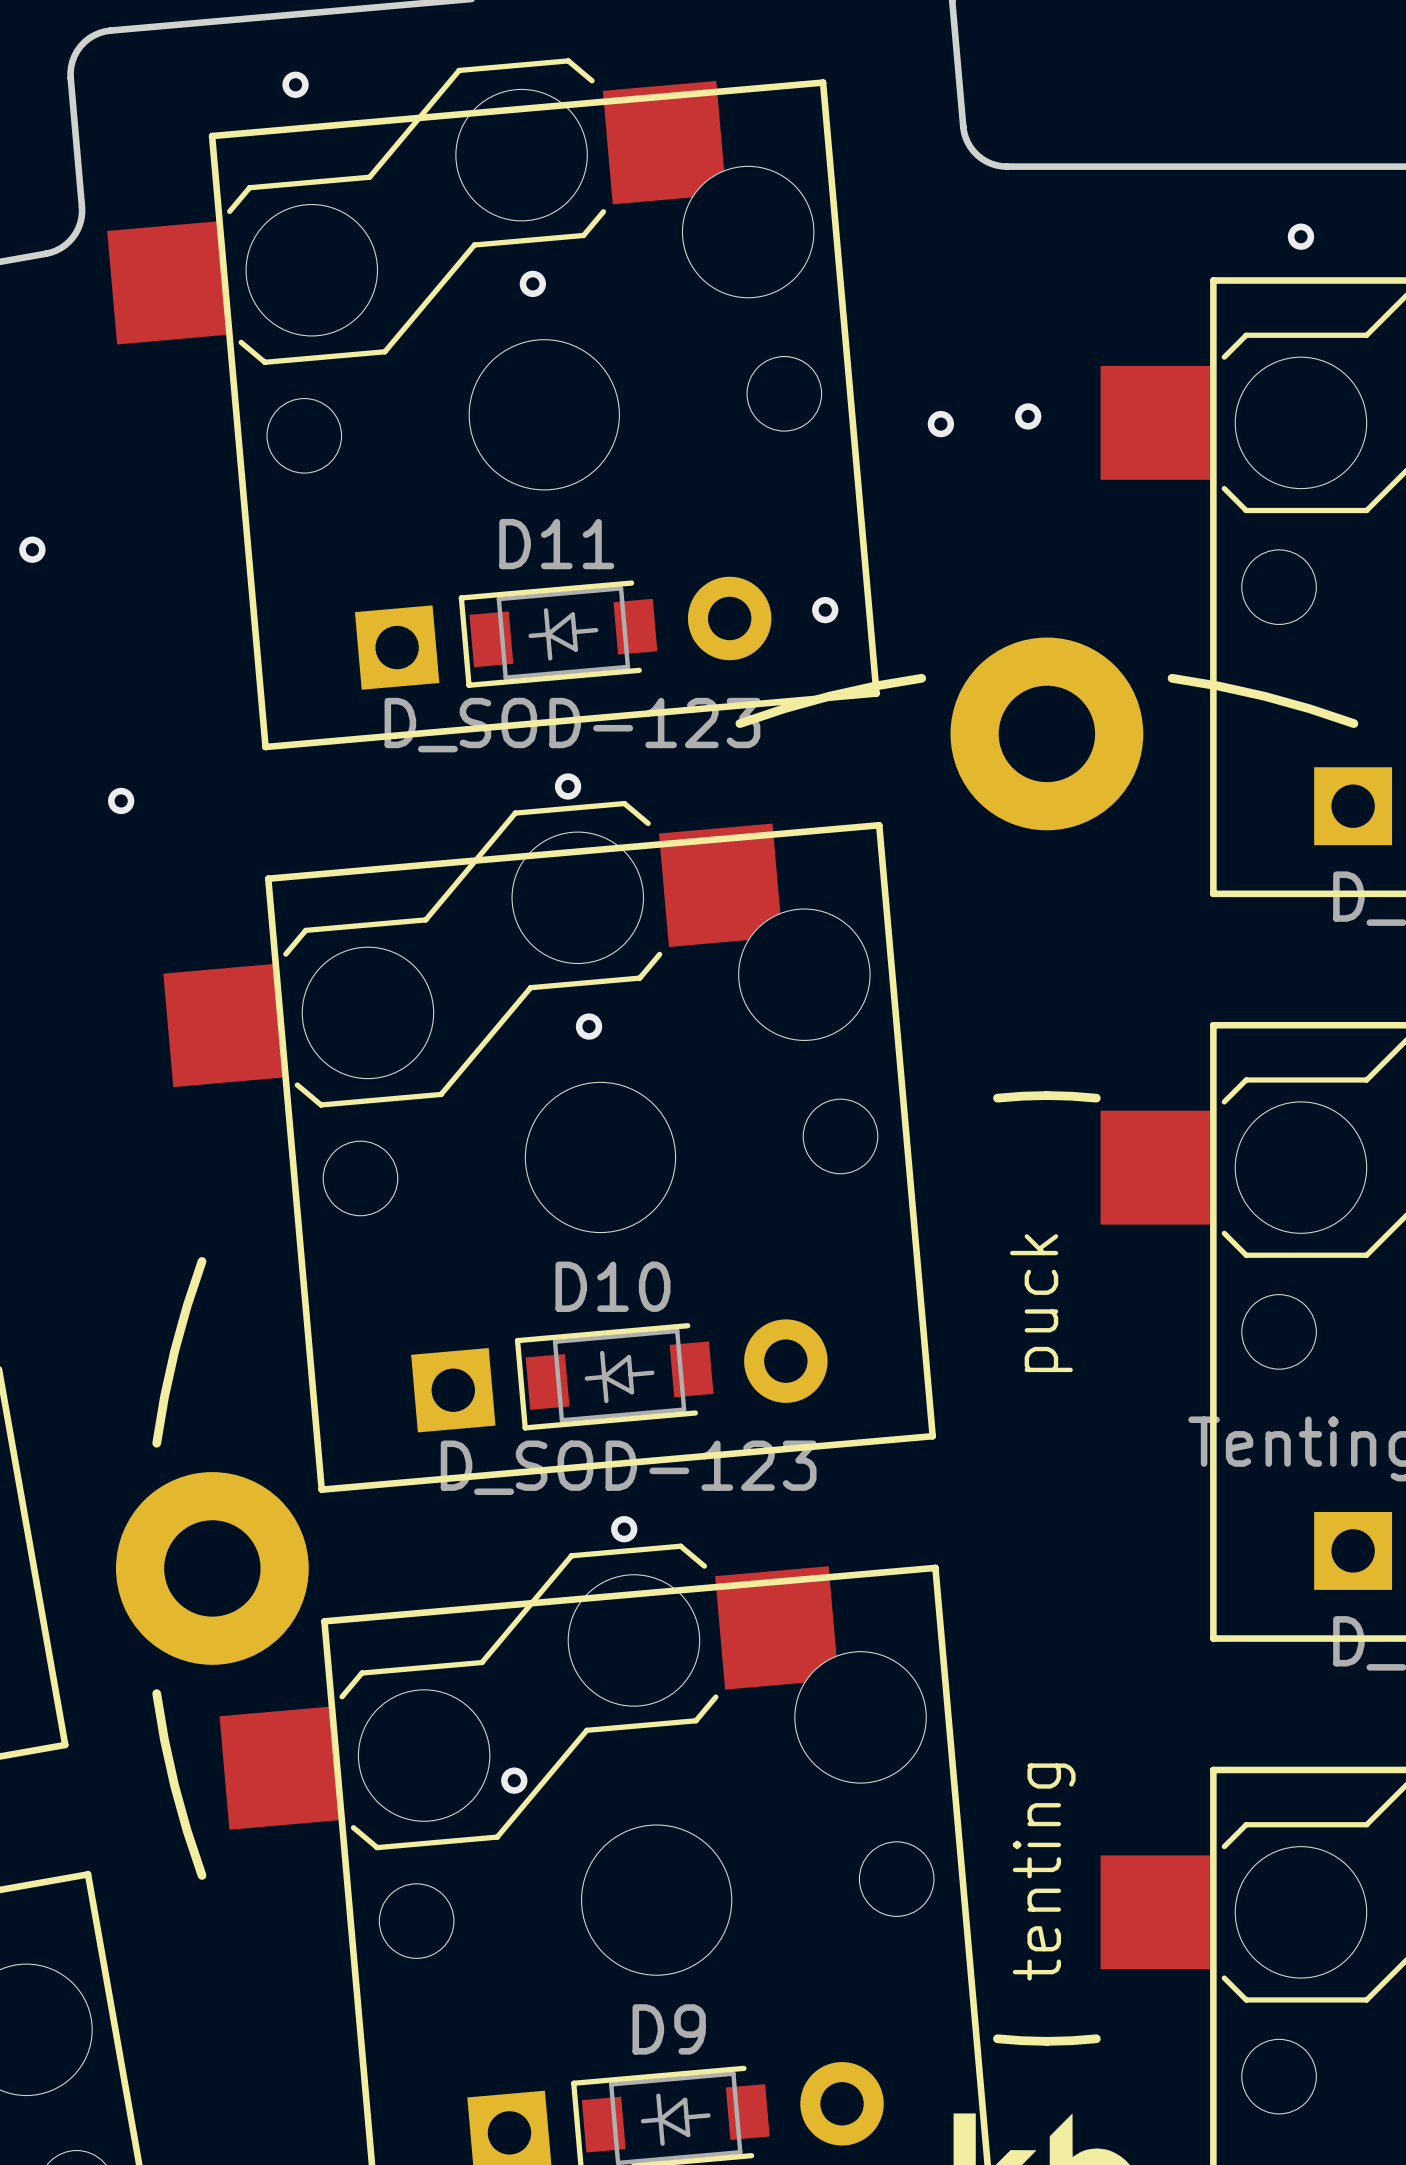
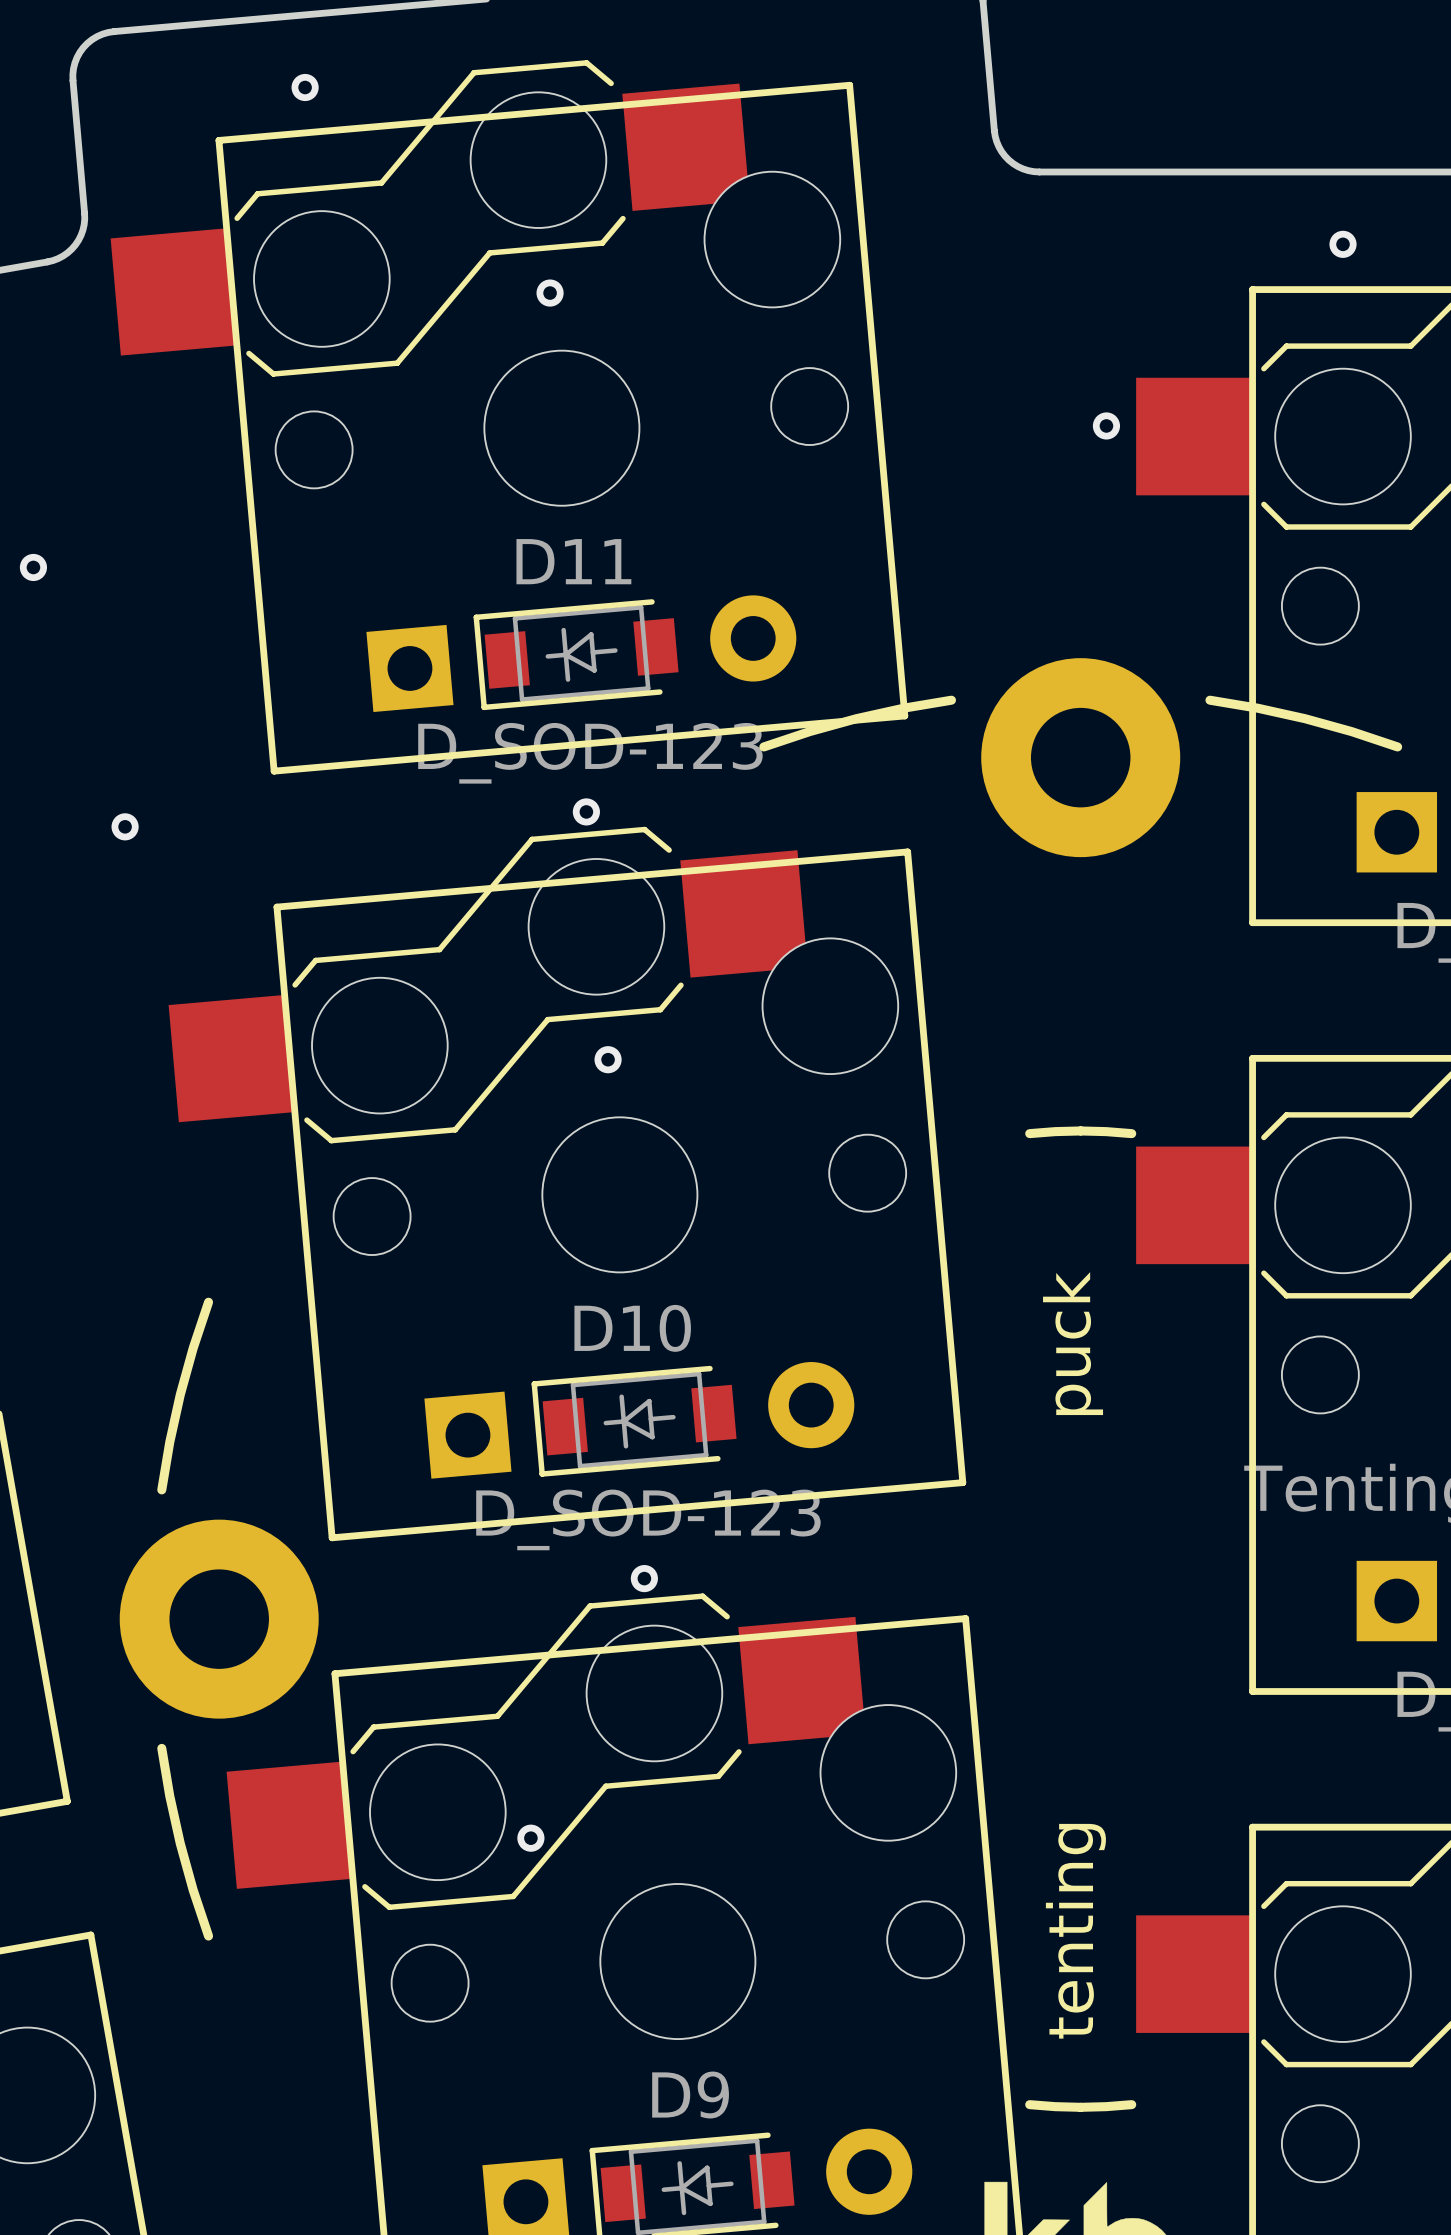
via position: (1028, 416) -> (1106, 425)
via: (940, 424) -> none
via: (825, 610) -> none

